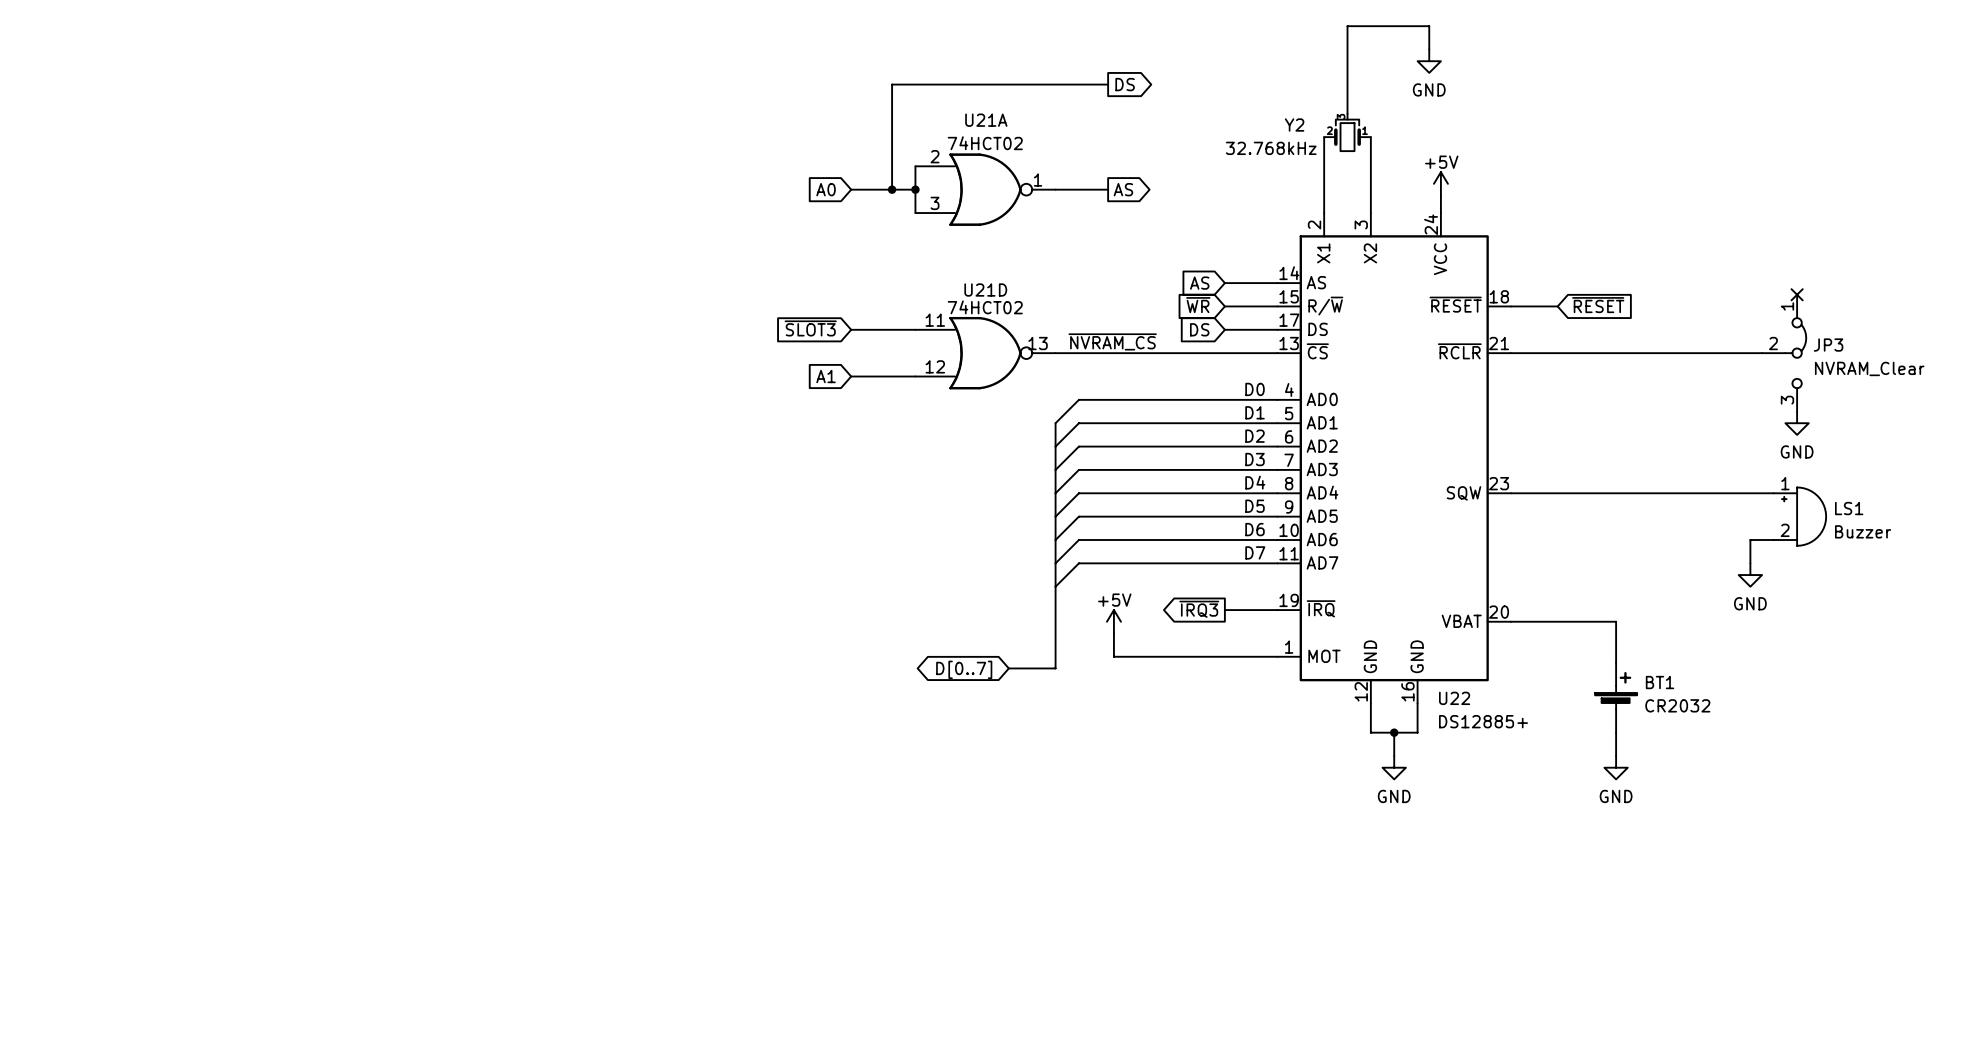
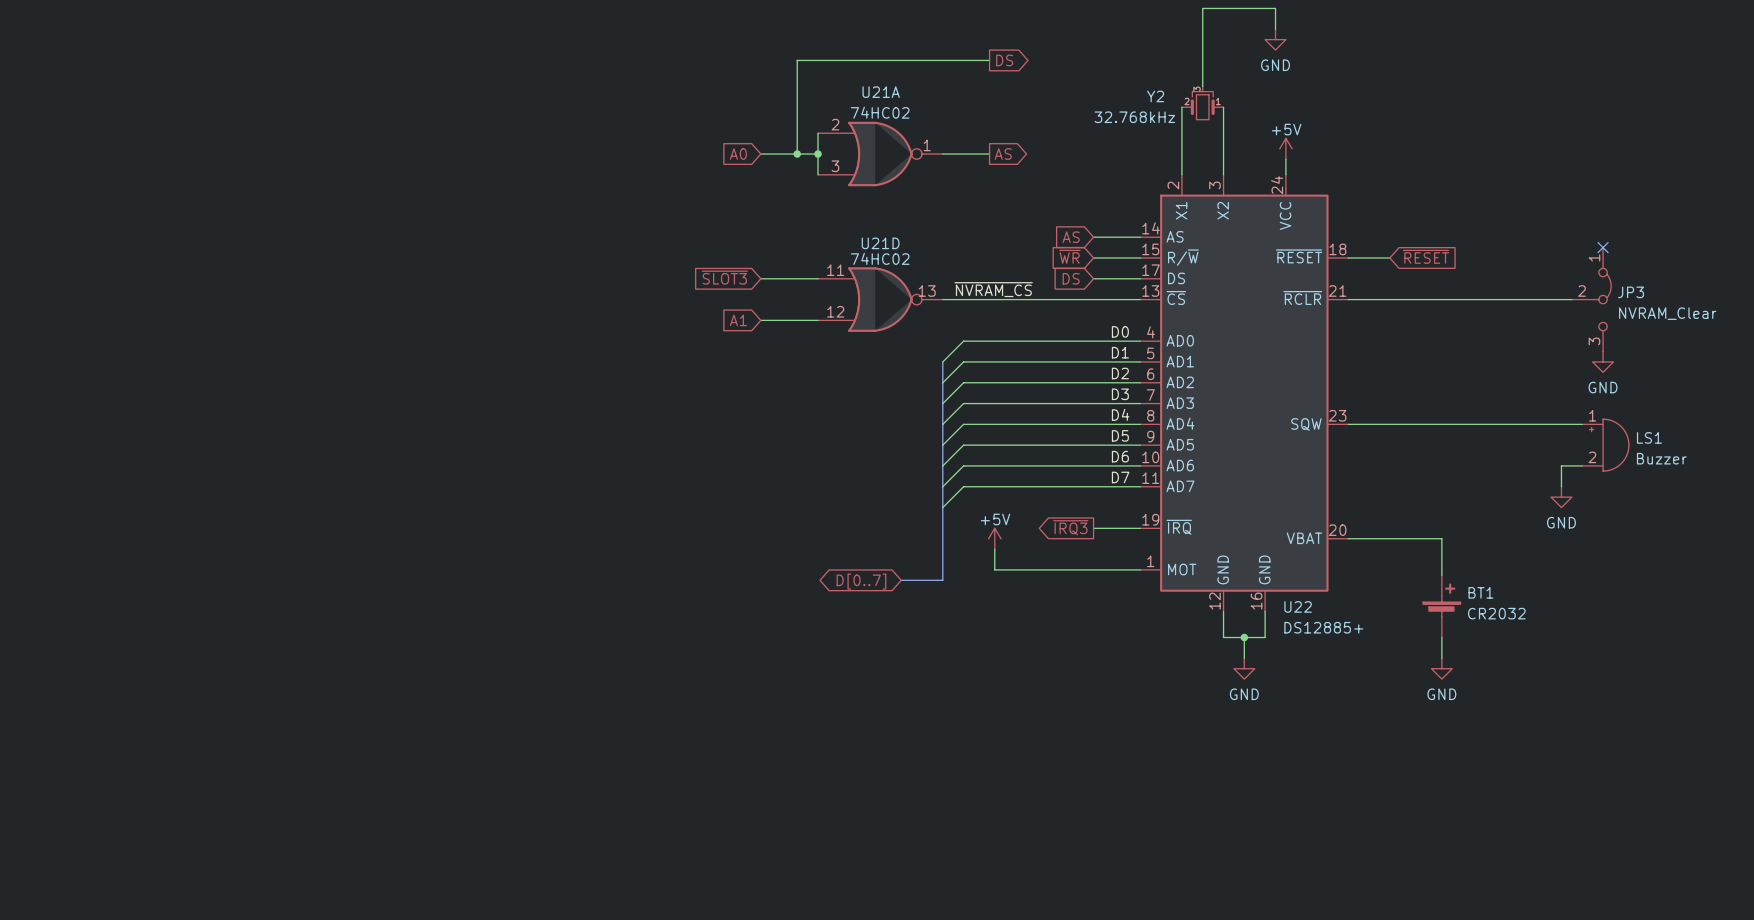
U21A value: 74HCT02 (985, 143) -> 74HC02 (880, 112)
U21D value: 74HCT02 (985, 307) -> 74HC02 (880, 258)

